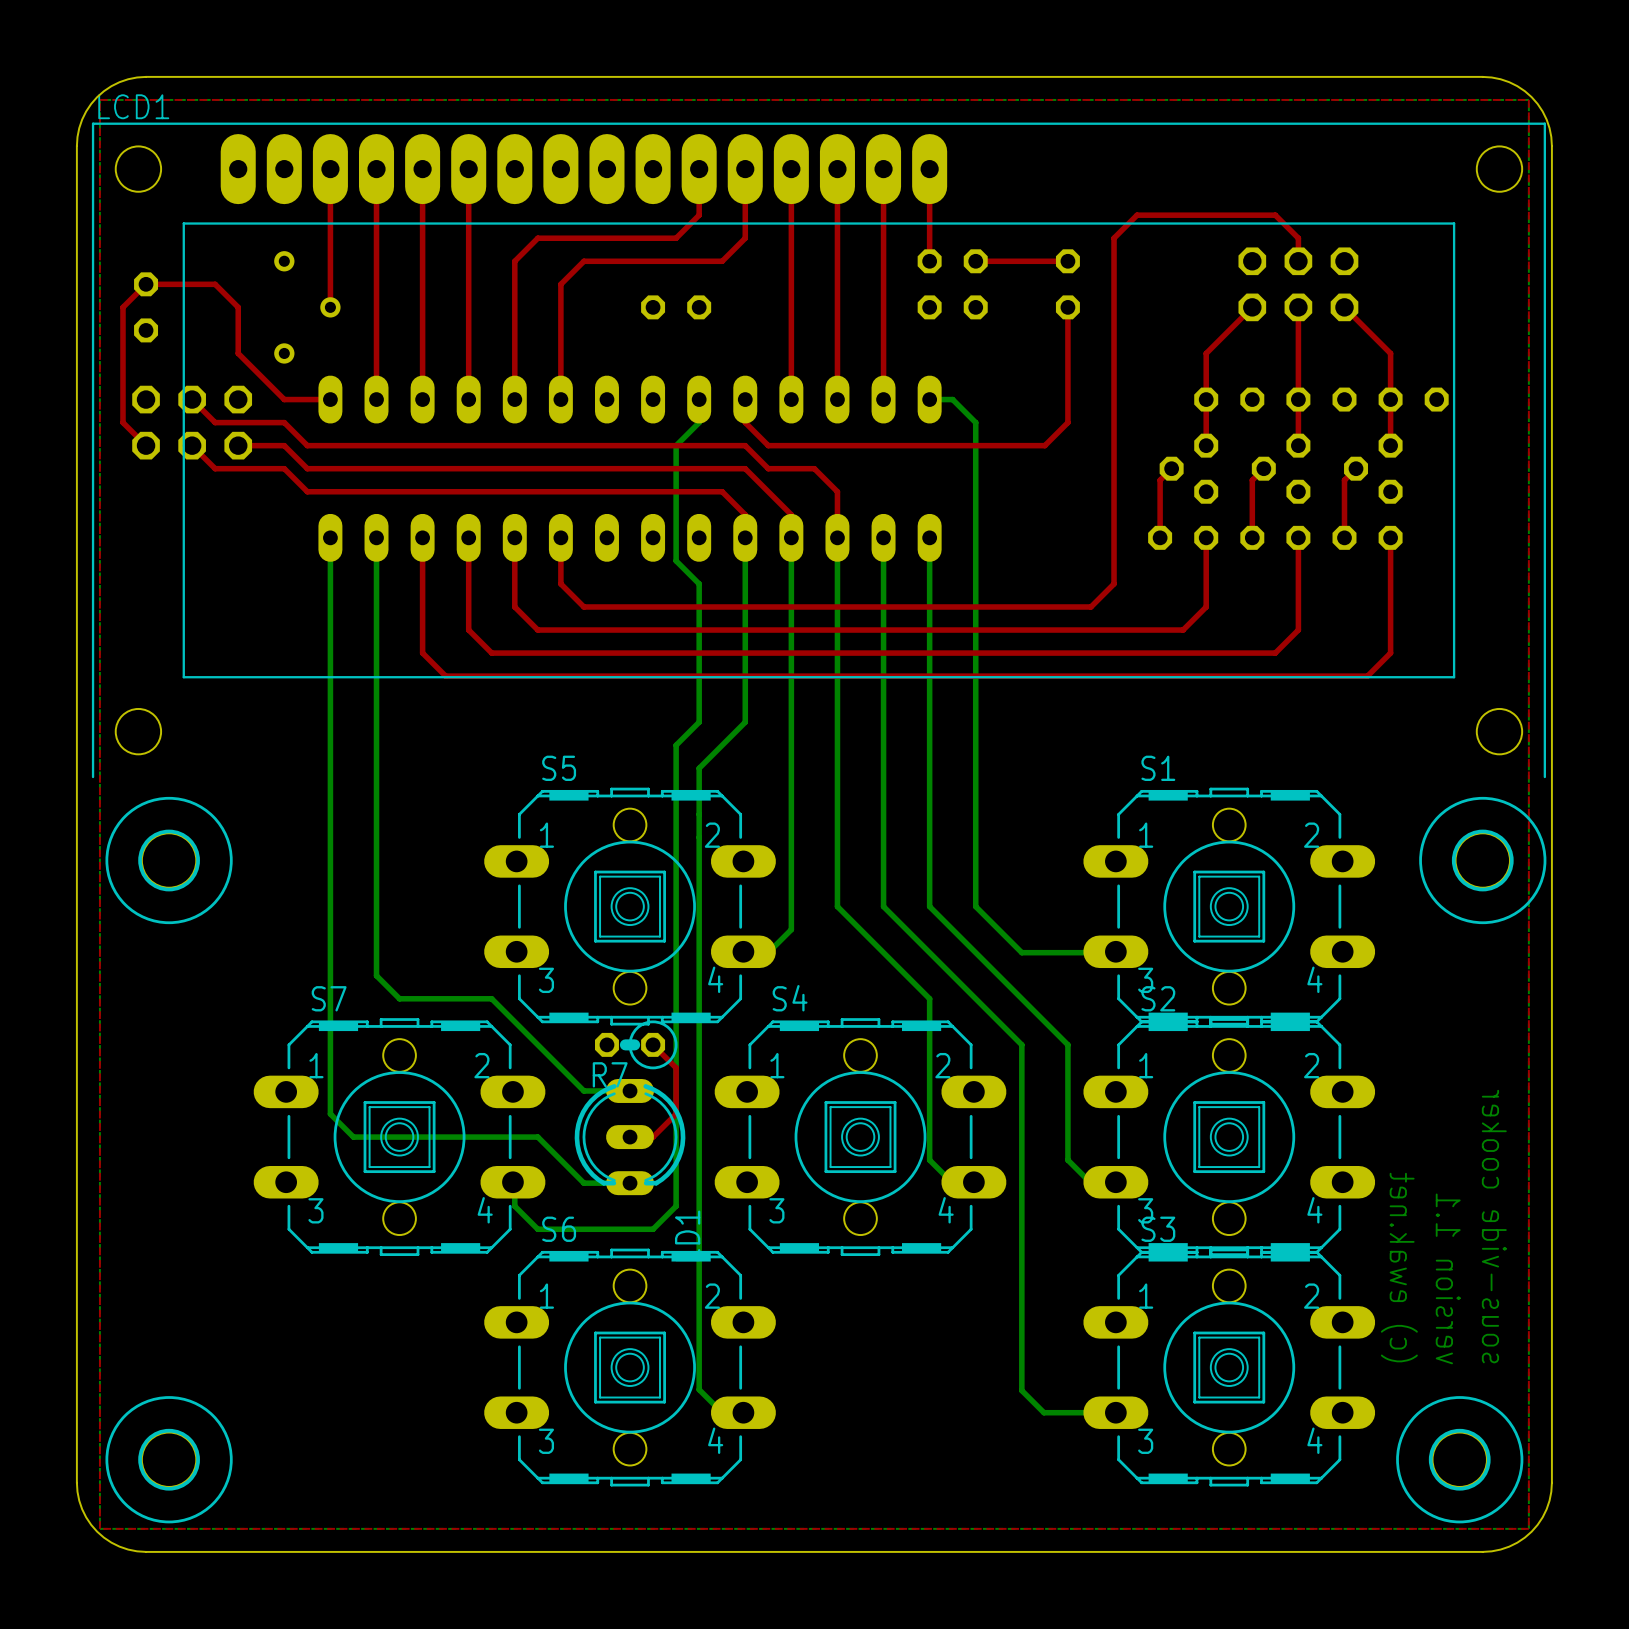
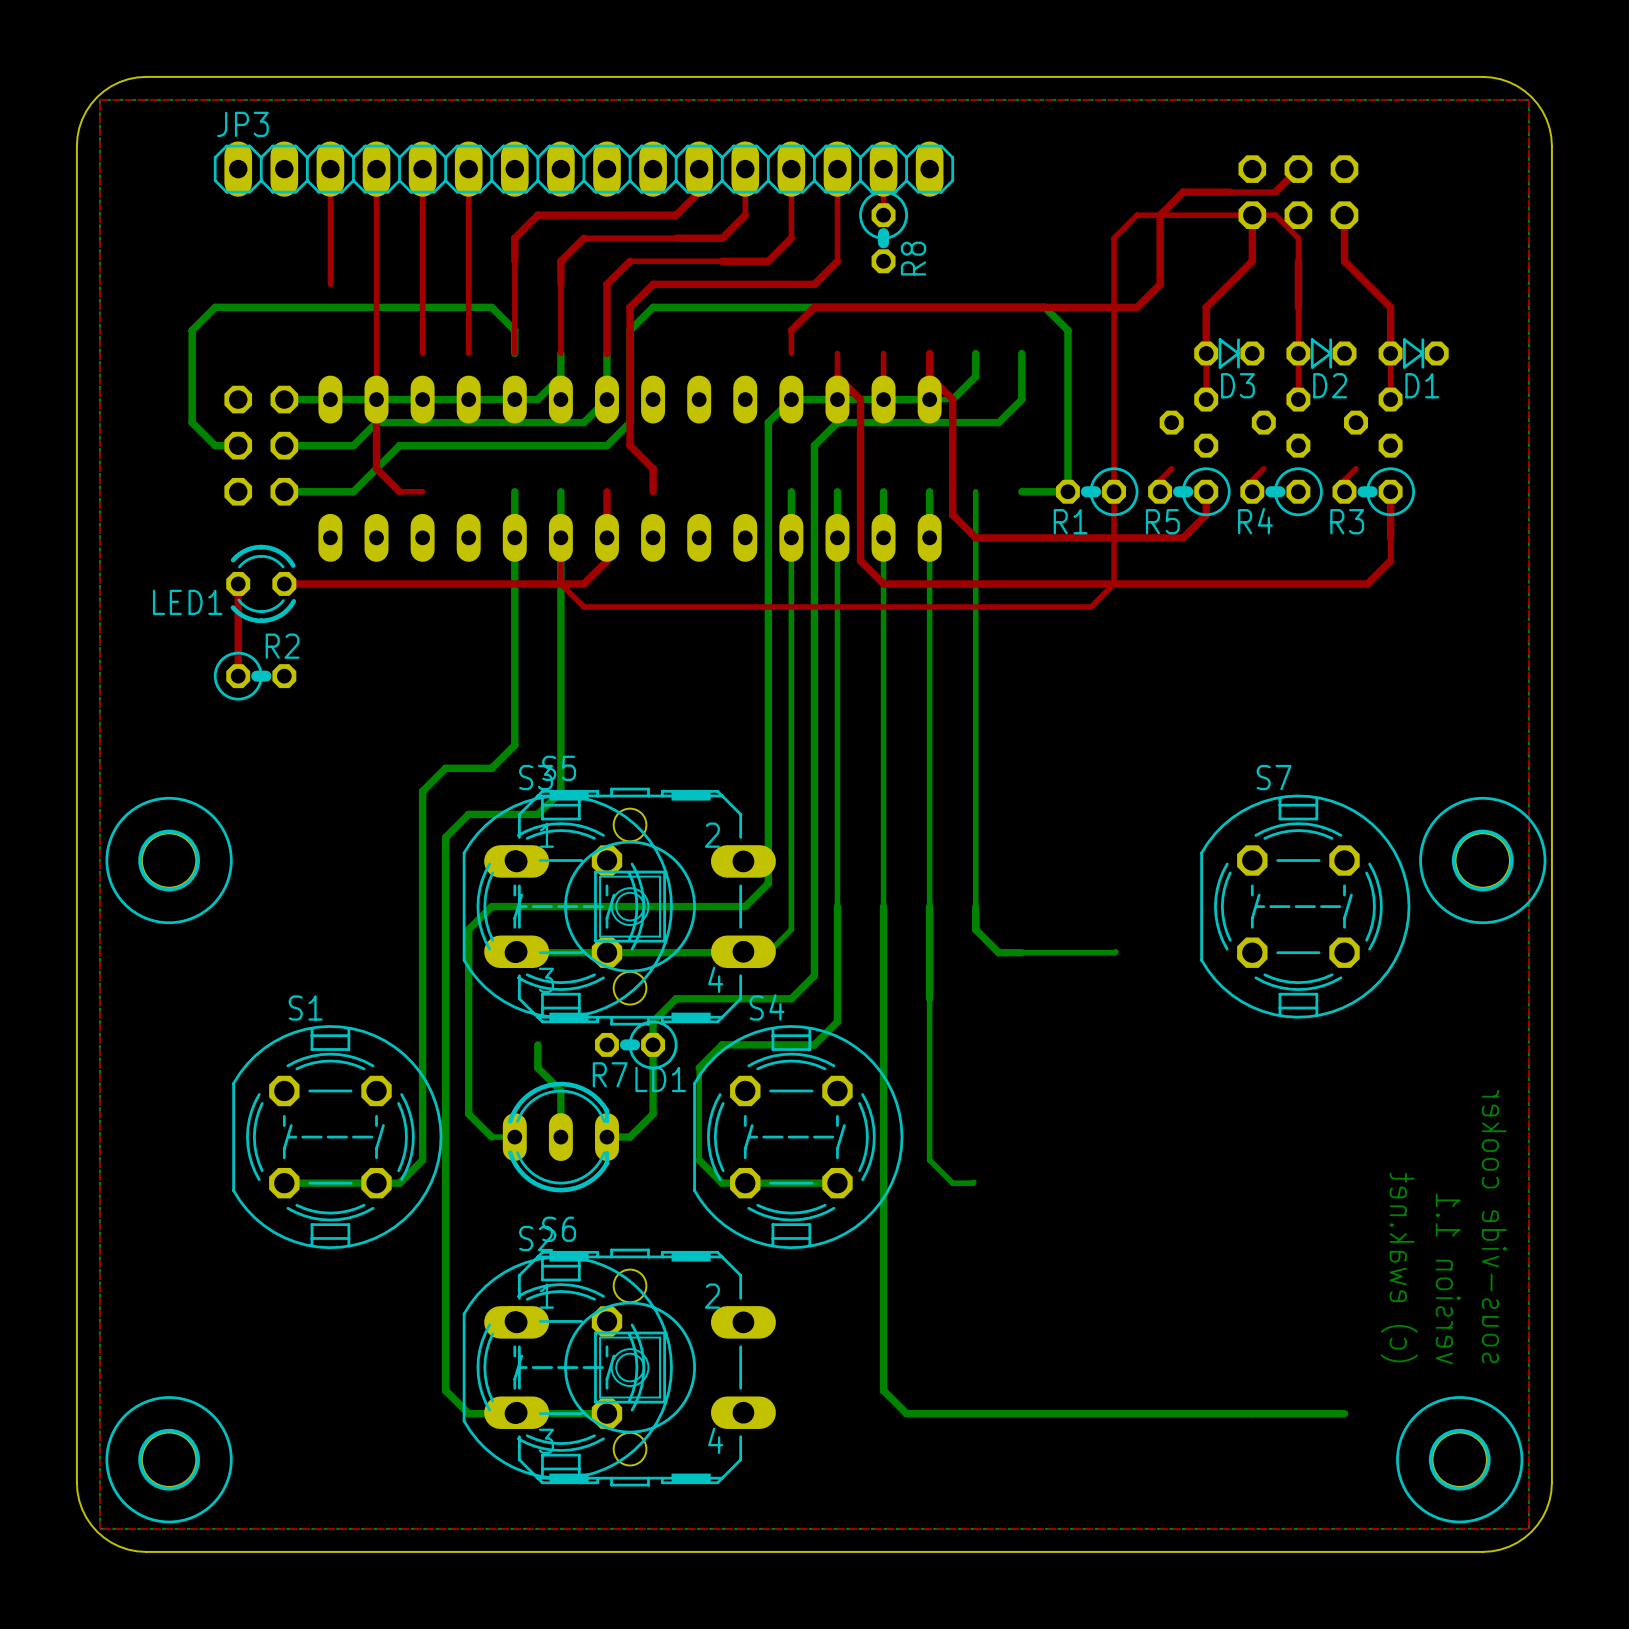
JP3: none -> (583, 169)
top track: (929, 169) (929, 261) -> none
top track: none -> (1298, 169) (1275, 192) (1183, 192) (1160, 215) (1160, 284) (1137, 307) (814, 307) (791, 330)
top track: (699, 192) (699, 215) (676, 238) -> none
top track: (745, 215) (745, 238) (722, 261) -> (745, 215) (722, 238) (676, 238)
top track: (883, 215) (883, 353) -> none
top track: (583, 238) (537, 238) (514, 261) -> (699, 192) (676, 215) (537, 215) (514, 238) (514, 261)
top track: (791, 238) (791, 330) -> (791, 238) (768, 261) (722, 261)
top track: (630, 261) (583, 261) (560, 284) -> (583, 238) (560, 261) (560, 284)
top track: none -> (630, 261) (606, 284) (606, 353)
top track: (837, 261) (837, 353) -> (837, 261) (814, 284) (653, 284) (630, 307) (630, 445) (653, 468) (653, 491)
top track: (975, 261) (1067, 261) -> none
top track: (330, 284) (330, 307) -> none
part: (929, 284) -> none
R8 side: bottom (975, 284) -> top (883, 232)
part: (1067, 284) -> none
part position: (1298, 284) -> (1298, 192)
part: (146, 307) -> none
part: (307, 307) -> none
part: (676, 307) -> none
top track: (1067, 307) (1067, 422) (1044, 445) (768, 445) (745, 422) (745, 399) -> none
top track: (1252, 307) (1206, 353) -> (1252, 215) (1252, 261) (1206, 307) (1206, 353)
top track: (1344, 307) (1390, 353) -> (1344, 215) (1344, 261) (1390, 307) (1390, 353)
top track: (422, 353) (422, 399) -> none
top track: (468, 353) (468, 399) -> none
bottom track: none -> (514, 353) (514, 330) (491, 307) (215, 307) (192, 330) (192, 422) (215, 445) (238, 445)
top track: (514, 353) (514, 399) -> none
bottom track: none -> (560, 353) (560, 376) (537, 399) (284, 399)
top track: (560, 353) (560, 399) -> none
bottom track: none -> (606, 353) (606, 399) (583, 422) (376, 422) (353, 445) (284, 445)
top track: (791, 353) (791, 399) -> none
top track: none -> (929, 353) (929, 376) (952, 399) (952, 514) (975, 537) (1183, 537) (1206, 514) (1206, 491)
bottom track: none -> (1021, 353) (1021, 399) (998, 422) (837, 422) (814, 445) (814, 975) (791, 998) (676, 998) (653, 1021) (653, 1114) (630, 1137) (606, 1137)
top track: (192, 399) (215, 422) (284, 422) (307, 445) (745, 445) (768, 468) (814, 468) (837, 491) (837, 537) -> none
top track: (330, 399) (284, 399) (238, 353) (238, 307) (215, 284) (146, 284) (122, 307) (122, 422) (146, 445) -> none
bottom track: (699, 399) (699, 422) (676, 445) (676, 560) (699, 583) (699, 722) (676, 745) (676, 1206) (653, 1229) (537, 1229) (514, 1206) (514, 1184) (512, 1182) -> none
bottom track: (952, 399) (975, 422) (975, 491) -> (952, 399) (975, 376) (975, 353)
top track: (1206, 399) (1206, 445) -> none
D1 side: bottom (1229, 399) -> top (1413, 353)
top track: (1298, 399) (1298, 445) -> (1298, 261) (1298, 307)
D2 side: bottom (1321, 399) -> top (1321, 353)
top track: (1390, 399) (1390, 445) -> none
D3 side: bottom (1413, 399) -> top (1229, 353)
part rotation: 0° (192, 422) -> 90° clockwise (261, 445)
part position: (192, 422) -> (261, 445)
top track: (192, 445) (215, 468) (284, 468) (307, 491) (399, 491) -> (376, 399) (376, 468) (399, 491)
top track: (238, 445) (284, 445) (307, 468) (745, 468) (791, 514) (791, 537) -> none
LCD1: (818, 450) -> none
part position: (1188, 468) -> (1188, 422)
part position: (1281, 468) -> (1281, 422)
part position: (1373, 468) -> (1373, 422)
bottom track: none -> (284, 491) (353, 491) (399, 445) (606, 445) (630, 422) (630, 330) (653, 307) (1044, 307) (1067, 330) (1067, 491) (1021, 491)
top track: (422, 491) (722, 491) (745, 514) (745, 537) -> none
bottom track: none -> (514, 491) (514, 745) (491, 768) (445, 768) (422, 791) (422, 1160) (399, 1183) (284, 1183)
bottom track: none -> (560, 491) (560, 791) (537, 814) (468, 814) (445, 837) (445, 1390) (468, 1413) (606, 1413)
top track: none -> (606, 491) (606, 560) (583, 583) (284, 583)
bottom track: none -> (791, 491) (791, 537)
bottom track: none -> (837, 491) (837, 537)
bottom track: none -> (883, 491) (883, 537)
bottom track: none -> (929, 491) (929, 537)
R1: none -> (1097, 491)
top track: (1160, 491) (1160, 537) -> none
R5: none -> (1189, 491)
top track: (1252, 491) (1252, 537) -> none
top track: (1344, 491) (1344, 537) -> (1390, 491) (1390, 537)
bottom track: (330, 537) (330, 1114) (353, 1137) (491, 1137) -> (929, 399) (791, 399) (768, 422) (768, 883) (745, 906) (491, 906) (468, 929) (468, 1114) (491, 1137)
bottom track: (376, 537) (376, 975) (399, 998) (491, 998) (583, 1090) (630, 1090) -> none
top track: (422, 537) (422, 653) (445, 676) (1367, 676) (1390, 653) (1390, 560) -> (837, 376) (860, 399) (860, 560) (883, 583) (1367, 583) (1390, 560)
top track: (468, 537) (468, 630) (491, 653) (1275, 653) (1298, 630) (1298, 537) -> none
top track: (514, 537) (514, 606) (537, 630) (1183, 630) (1206, 606) (1206, 537) -> none
bottom track: (745, 537) (745, 722) (699, 768) (699, 1067) -> (837, 906) (837, 1021) (814, 1044) (722, 1044) (699, 1067)
part: (1183, 537) -> none
R3 side: bottom (1275, 537) -> top (1373, 491)
R4 side: bottom (1367, 537) -> top (1281, 491)
top track: none -> (238, 583) (238, 676)
LED1: none -> (261, 583)
R2: none -> (255, 676)
S1 name position: S1 (1158, 768) -> S1 (305, 1008)
S1 footprint: [1083, 787, 1376, 1026] -> [232, 1025, 443, 1250]
bottom track: (837, 906) (929, 998) -> (929, 906) (929, 998)
bottom track: (883, 906) (1021, 1044) (1021, 1390) (1043, 1412) (1115, 1412) -> (883, 906) (883, 1390) (906, 1413) (1344, 1413)
bottom track: (929, 906) (1067, 1044) (1067, 1160) (1090, 1182) (1115, 1182) -> none
bottom track: (975, 906) (1021, 952) -> (975, 906) (975, 929) (998, 952) (1021, 952)
bottom track: none -> (514, 952) (744, 952)
S7 name position: S7 (329, 998) -> S7 (1274, 777)
S4 name position: S4 (790, 998) -> S4 (767, 1007)
S2 name position: S2 (1158, 998) -> S2 (536, 1238)
S7 footprint: [253, 1018, 546, 1256] -> [1200, 794, 1411, 1019]
S4 footprint: [714, 1018, 1007, 1256] -> [693, 1025, 904, 1250]
S2 footprint: [1083, 1018, 1376, 1256] -> [462, 1255, 673, 1480]
bottom track: none -> (537, 1044) (537, 1067) (560, 1090) (560, 1137)
top track: (653, 1044) (676, 1067) (676, 1114) (653, 1137) (630, 1137) -> none
bottom track: (514, 1137) (537, 1137) (583, 1183) (630, 1183) -> none
LD1 rotation: 0° (630, 1137) -> 90° counterclockwise (560, 1137)
bottom track: (699, 1160) (699, 1389) (722, 1412) -> (699, 1160) (722, 1183) (837, 1183)
S3 name position: S3 (1158, 1229) -> S3 (536, 777)
S3 footprint: [1083, 1248, 1376, 1487] -> [462, 794, 673, 1019]

